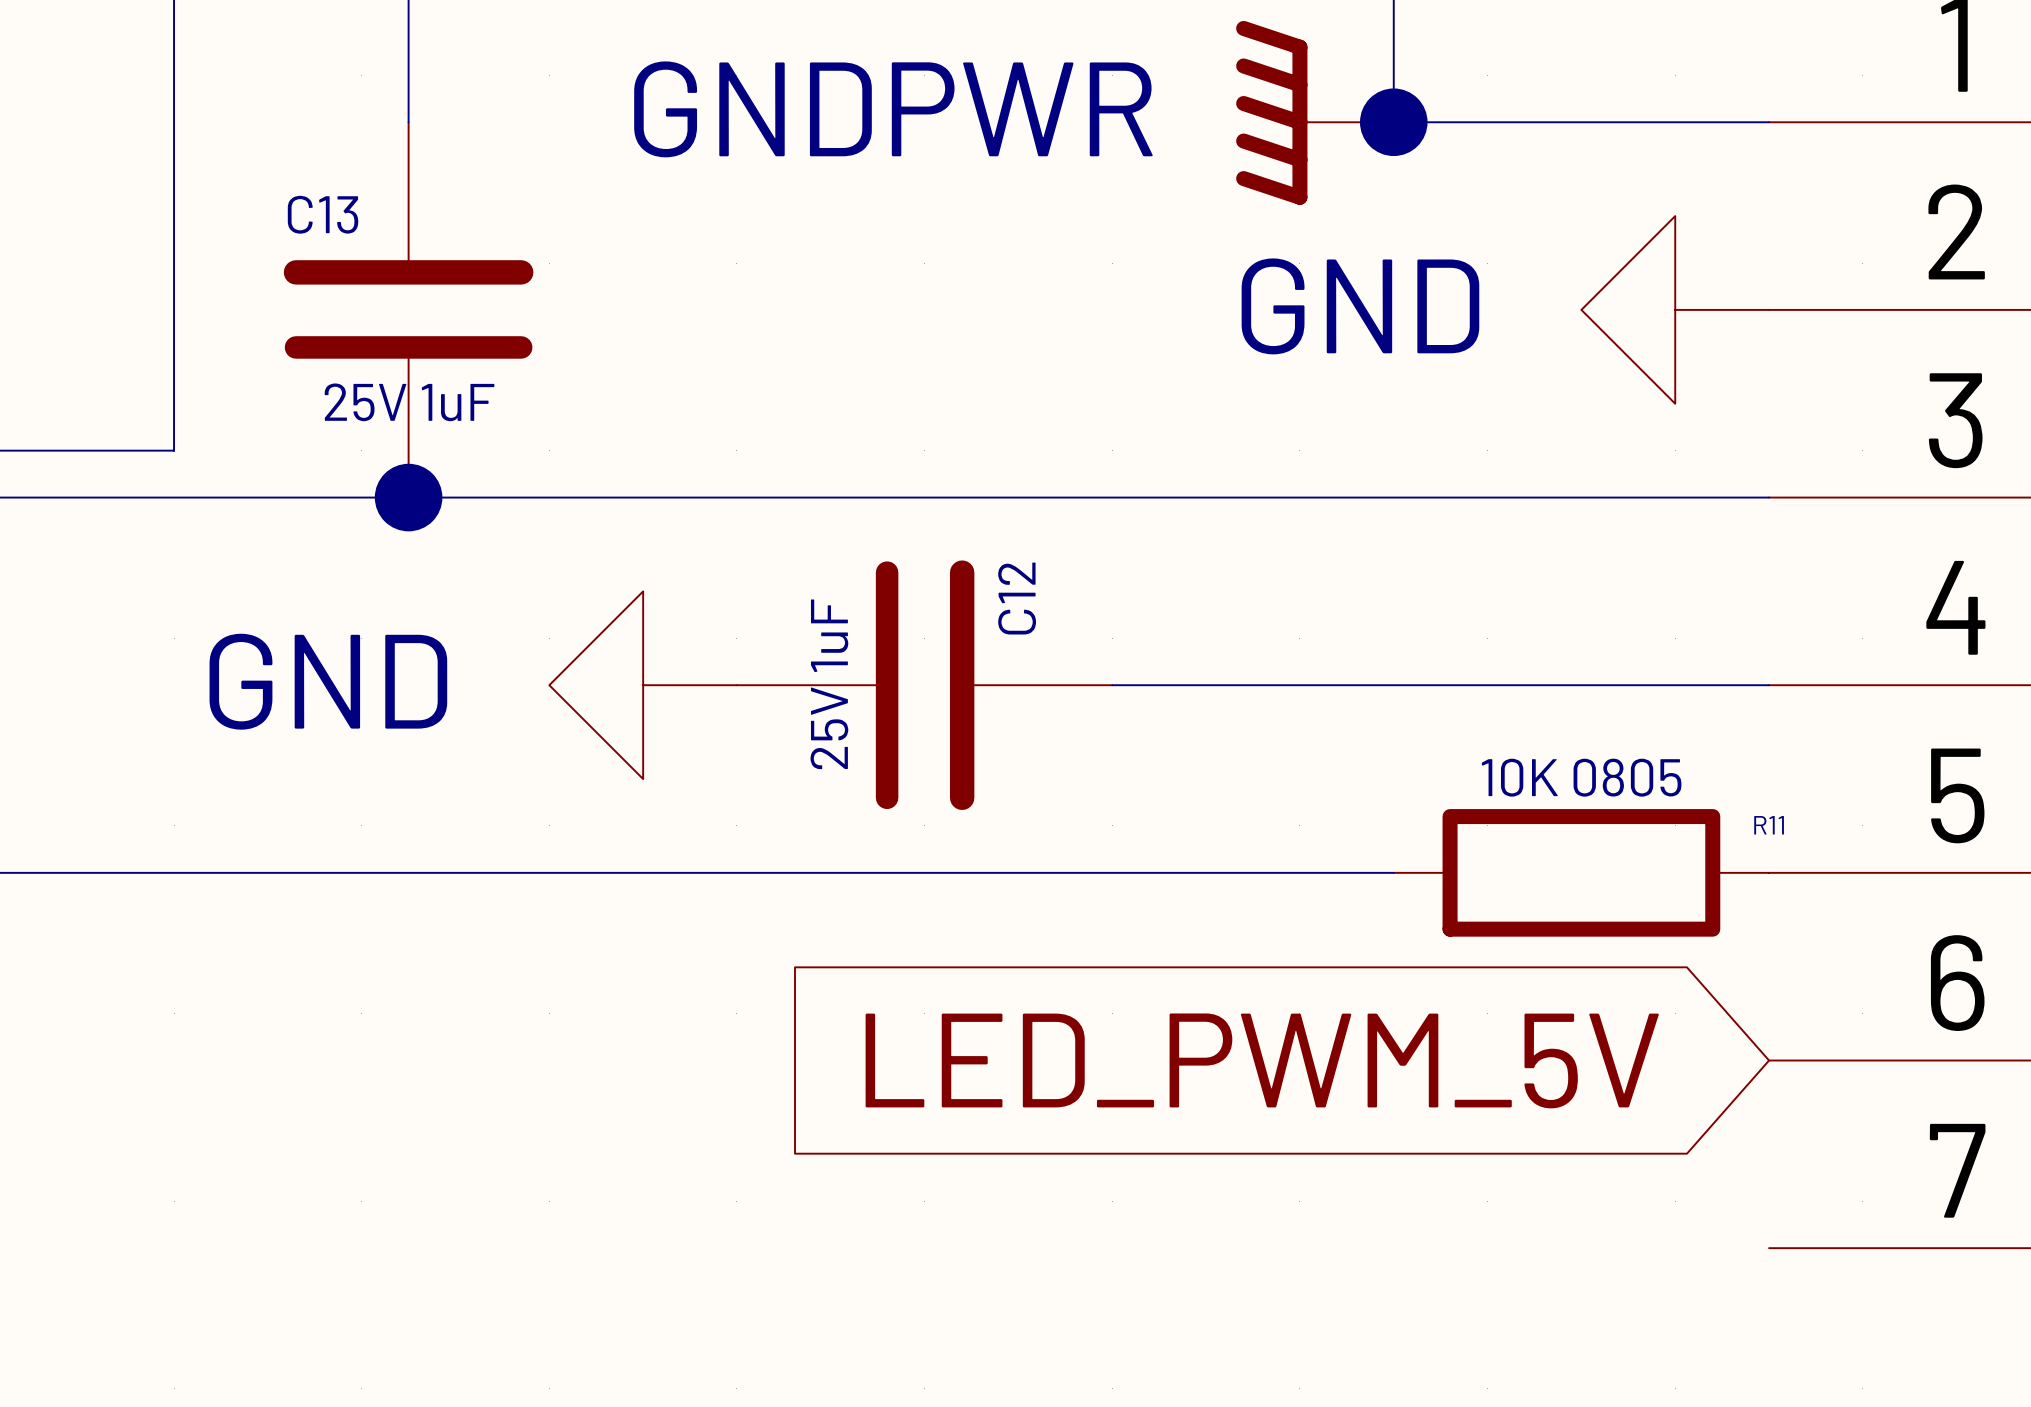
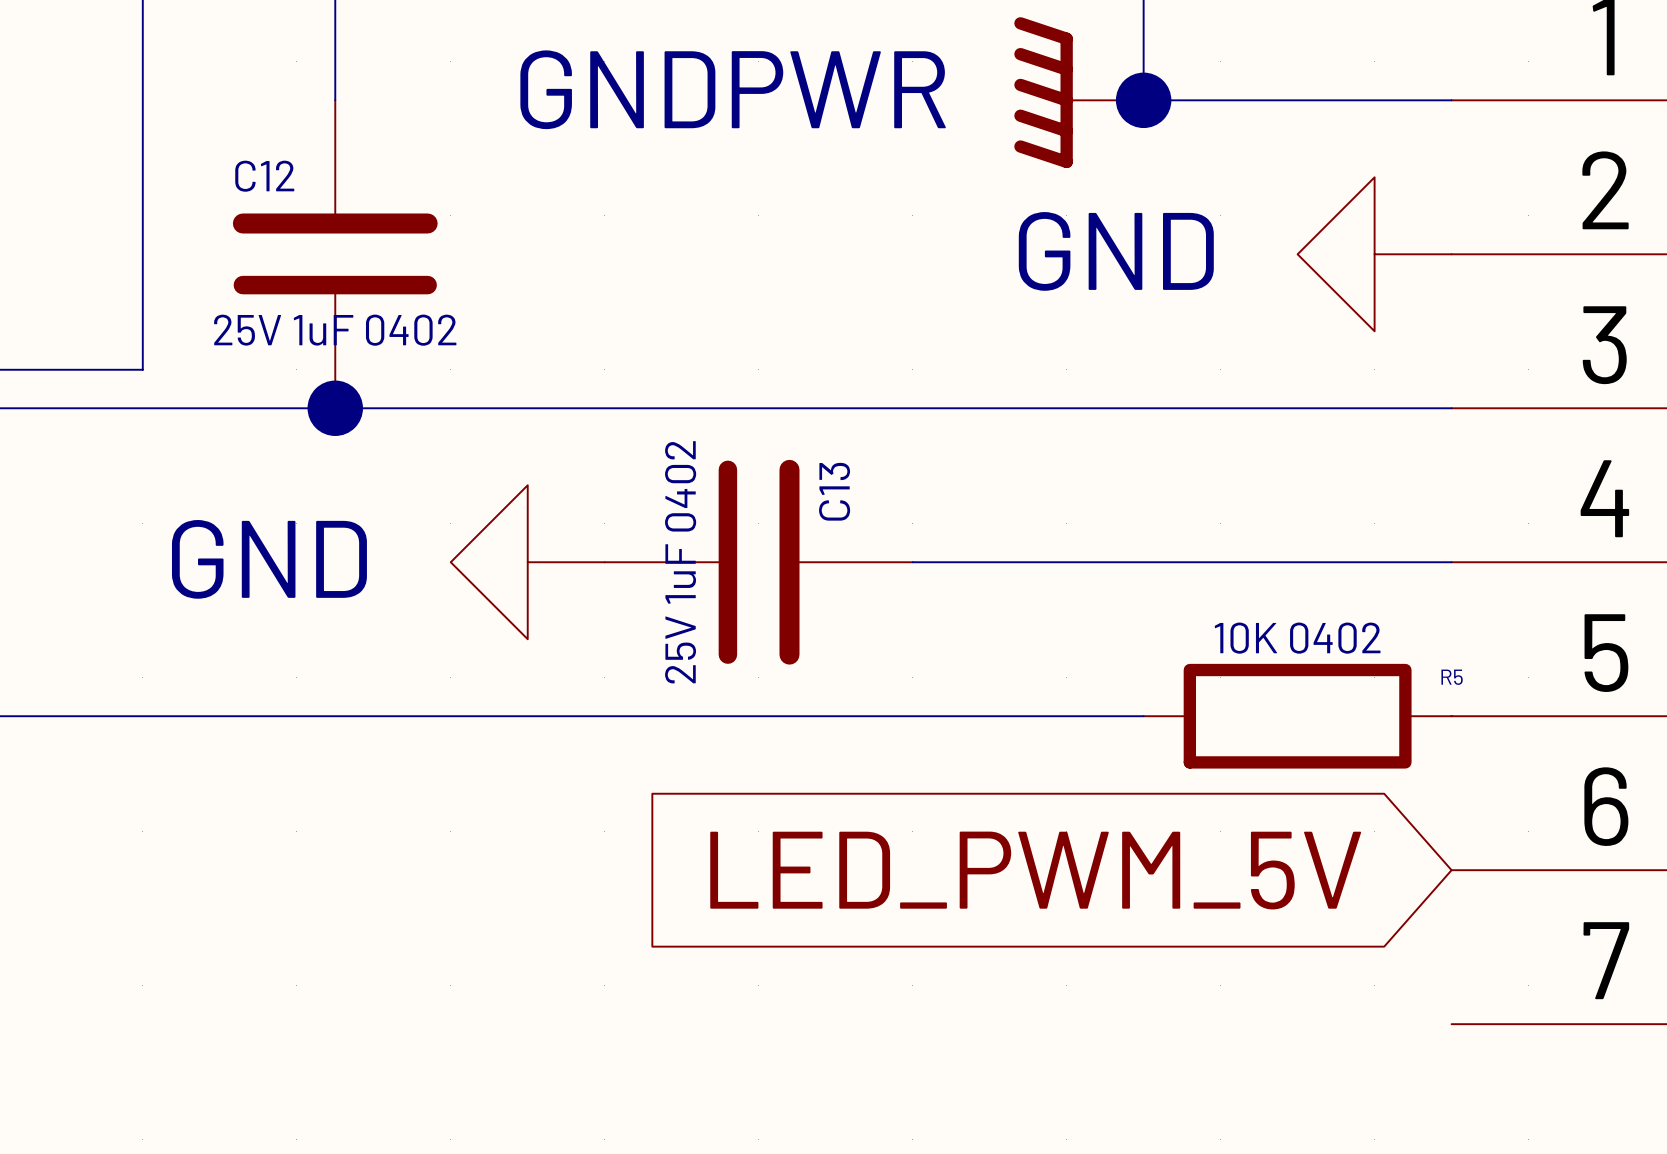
C13 name: C13 (323, 214) -> C12 (264, 176)
C13 value: 25V 1uF (409, 402) -> 25V 1uF 0402 (335, 330)
C12 name: C12 (1017, 598) -> C13 (834, 491)
C12 value: 25V 1uF (829, 684) -> 25V 1uF 0402 (680, 562)
R11 value: 10K 0805 (1581, 777) -> 10K 0402 (1297, 638)
R11 name: R11 (1769, 825) -> R5 (1452, 677)

